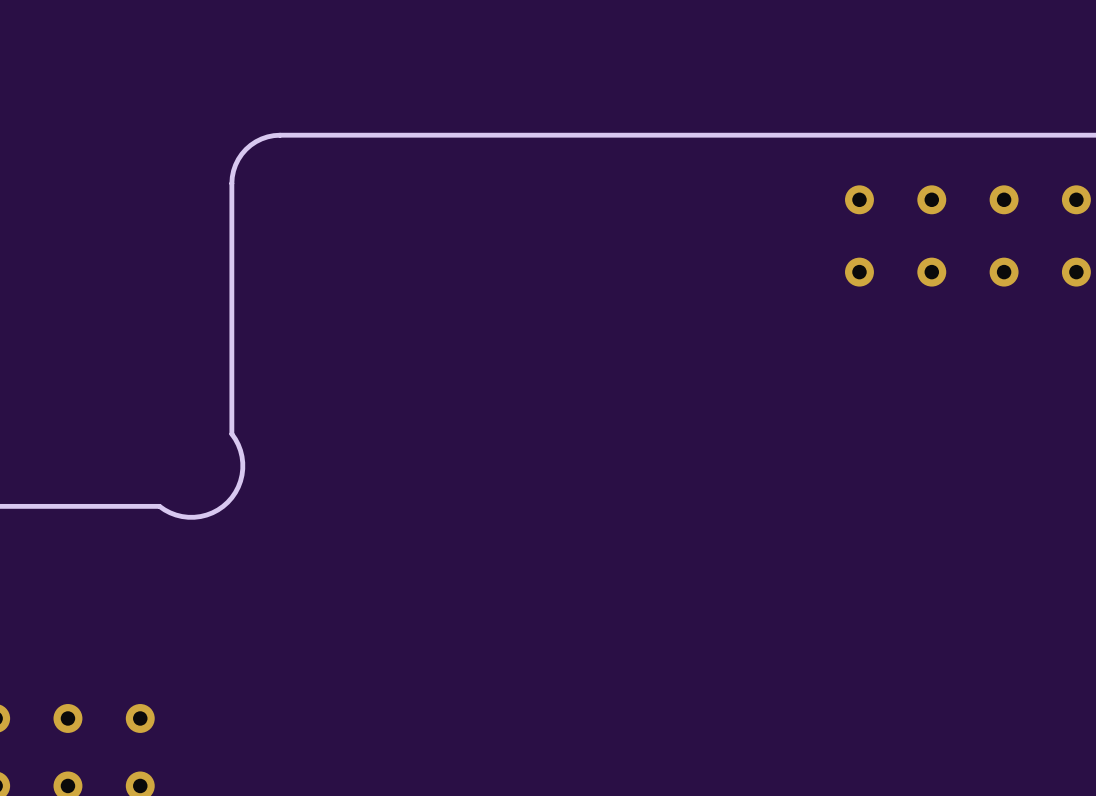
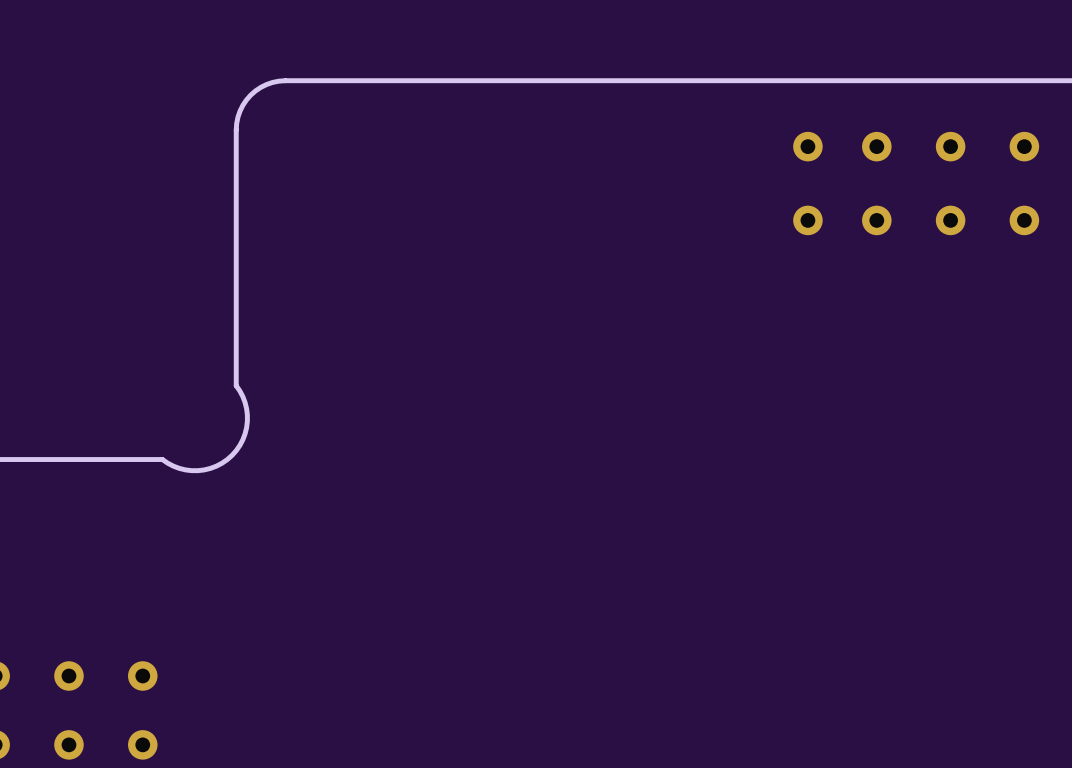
via: none -> (807, 146)
via: none -> (807, 220)

